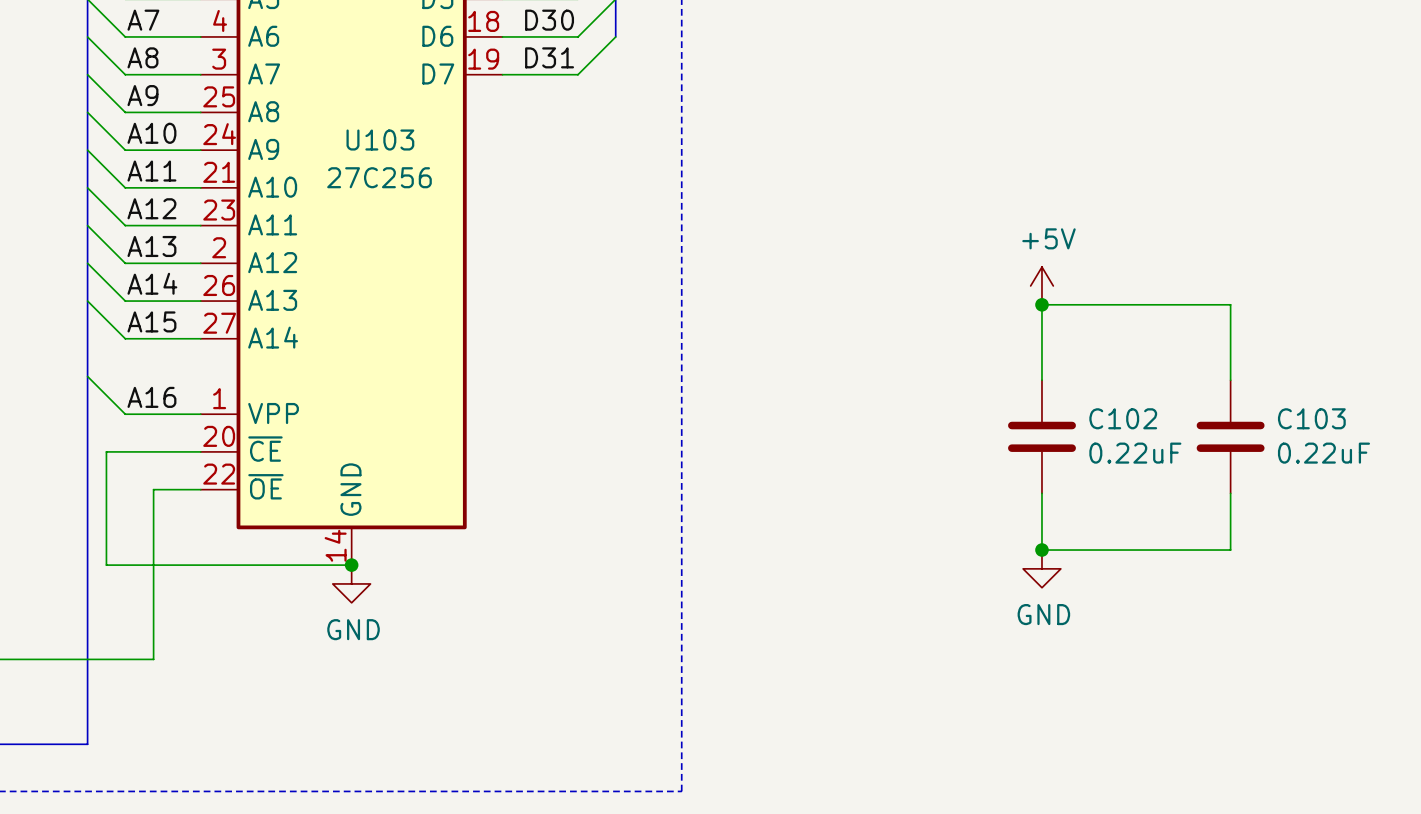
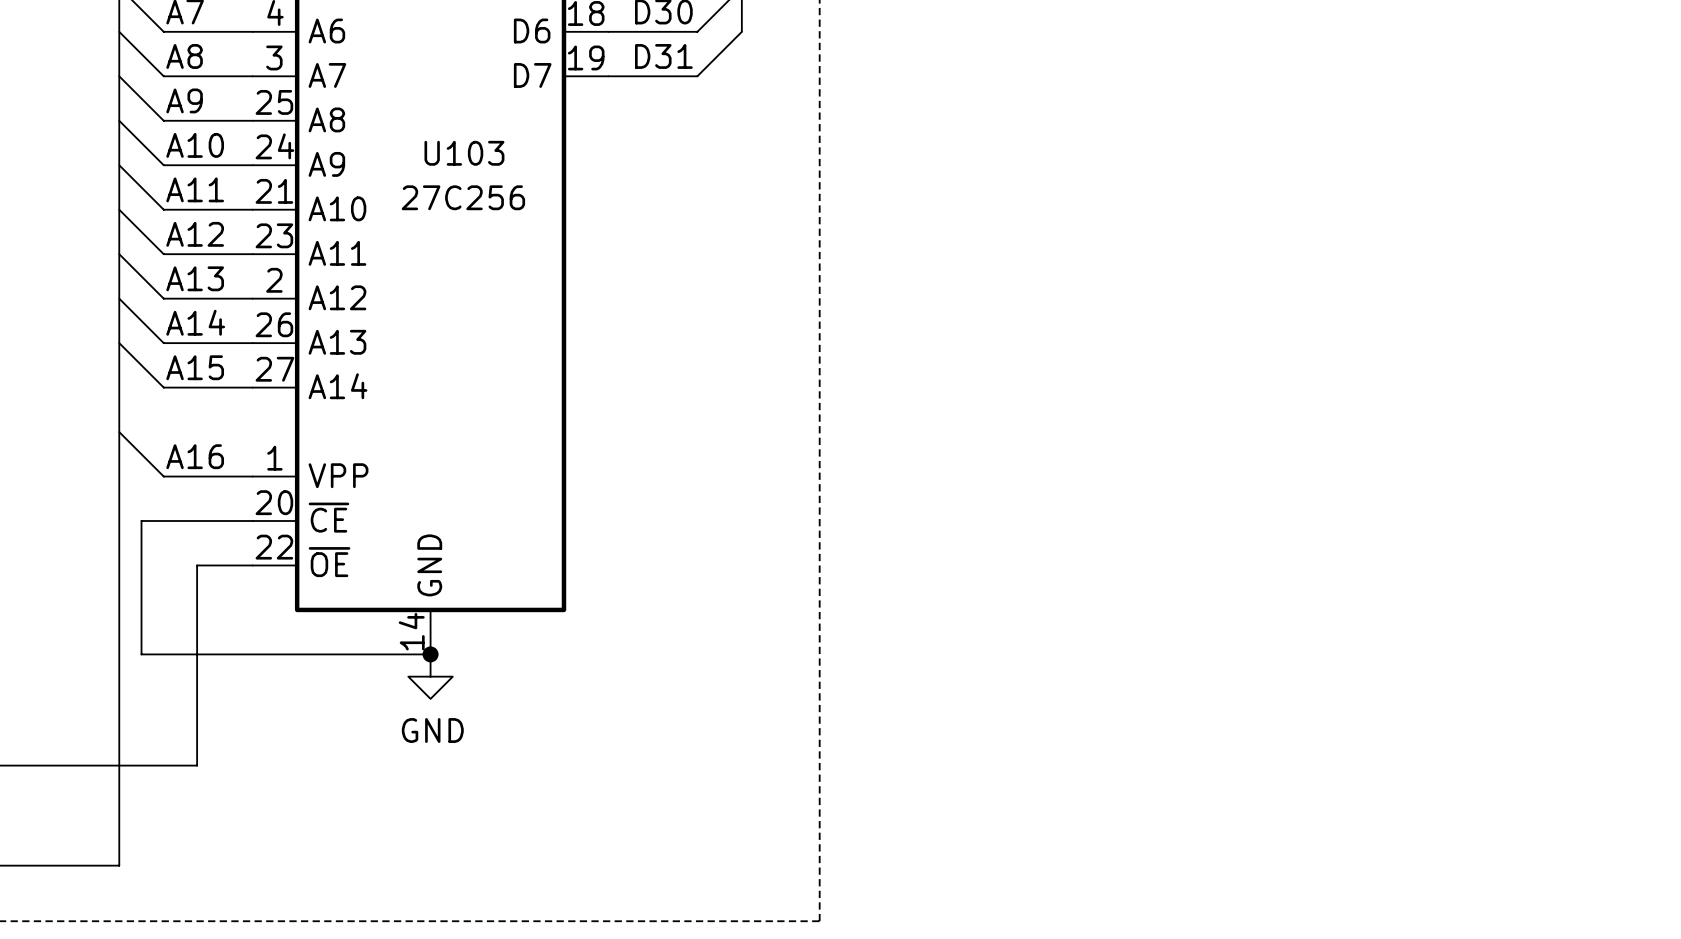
power symbol: +5V (1041, 285) -> none
junction: (1041, 304) -> none
wire: (1041, 380) (1041, 304) (1230, 304) (1230, 380) -> none
C102: 0.22uF (1041, 436) -> none
C103: 0.22uF (1230, 436) -> none
wire: (1041, 493) (1041, 550) (1230, 550) (1230, 493) -> none
junction: (1041, 550) -> none
power symbol: GND (1041, 568) -> none

